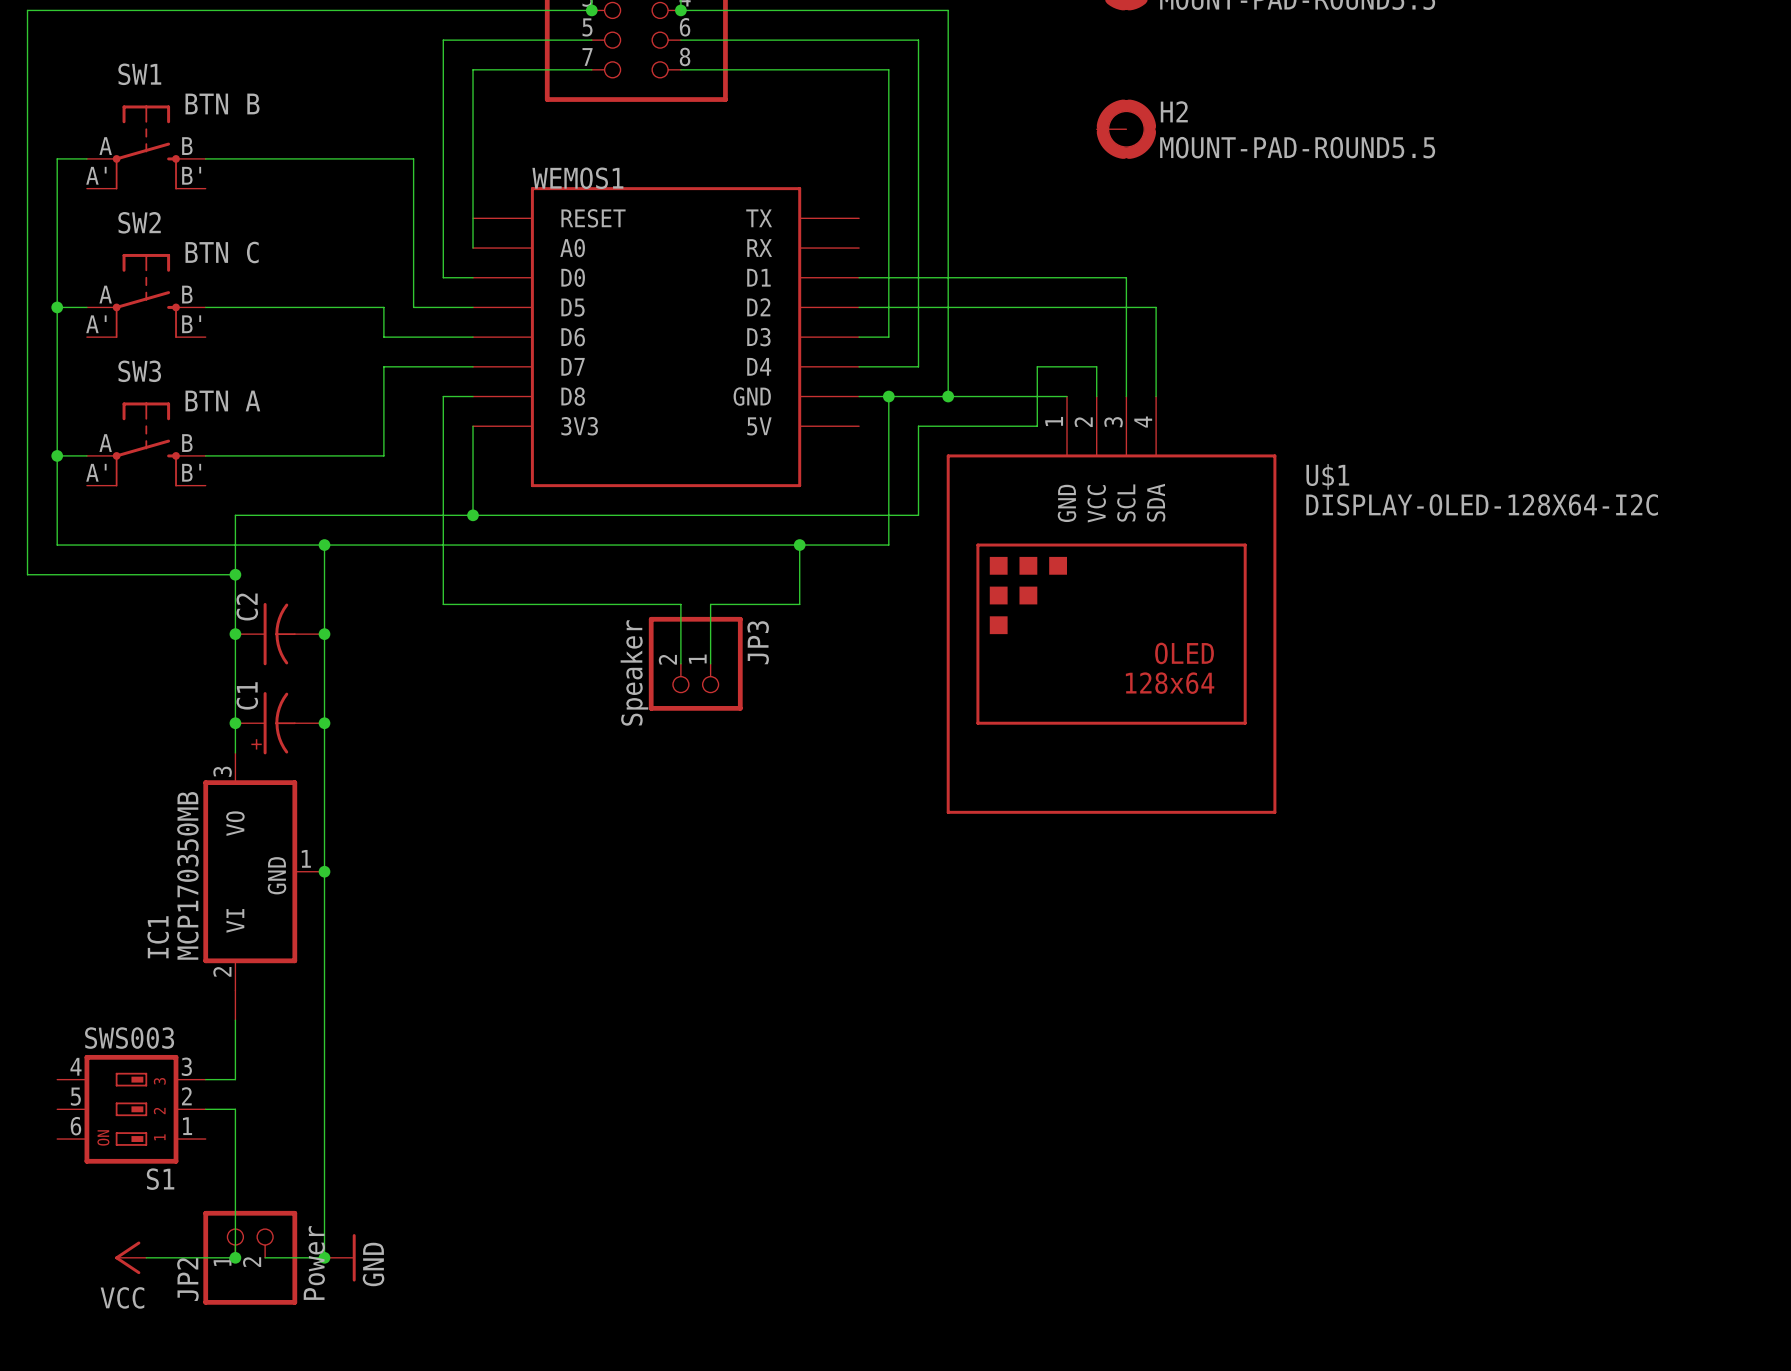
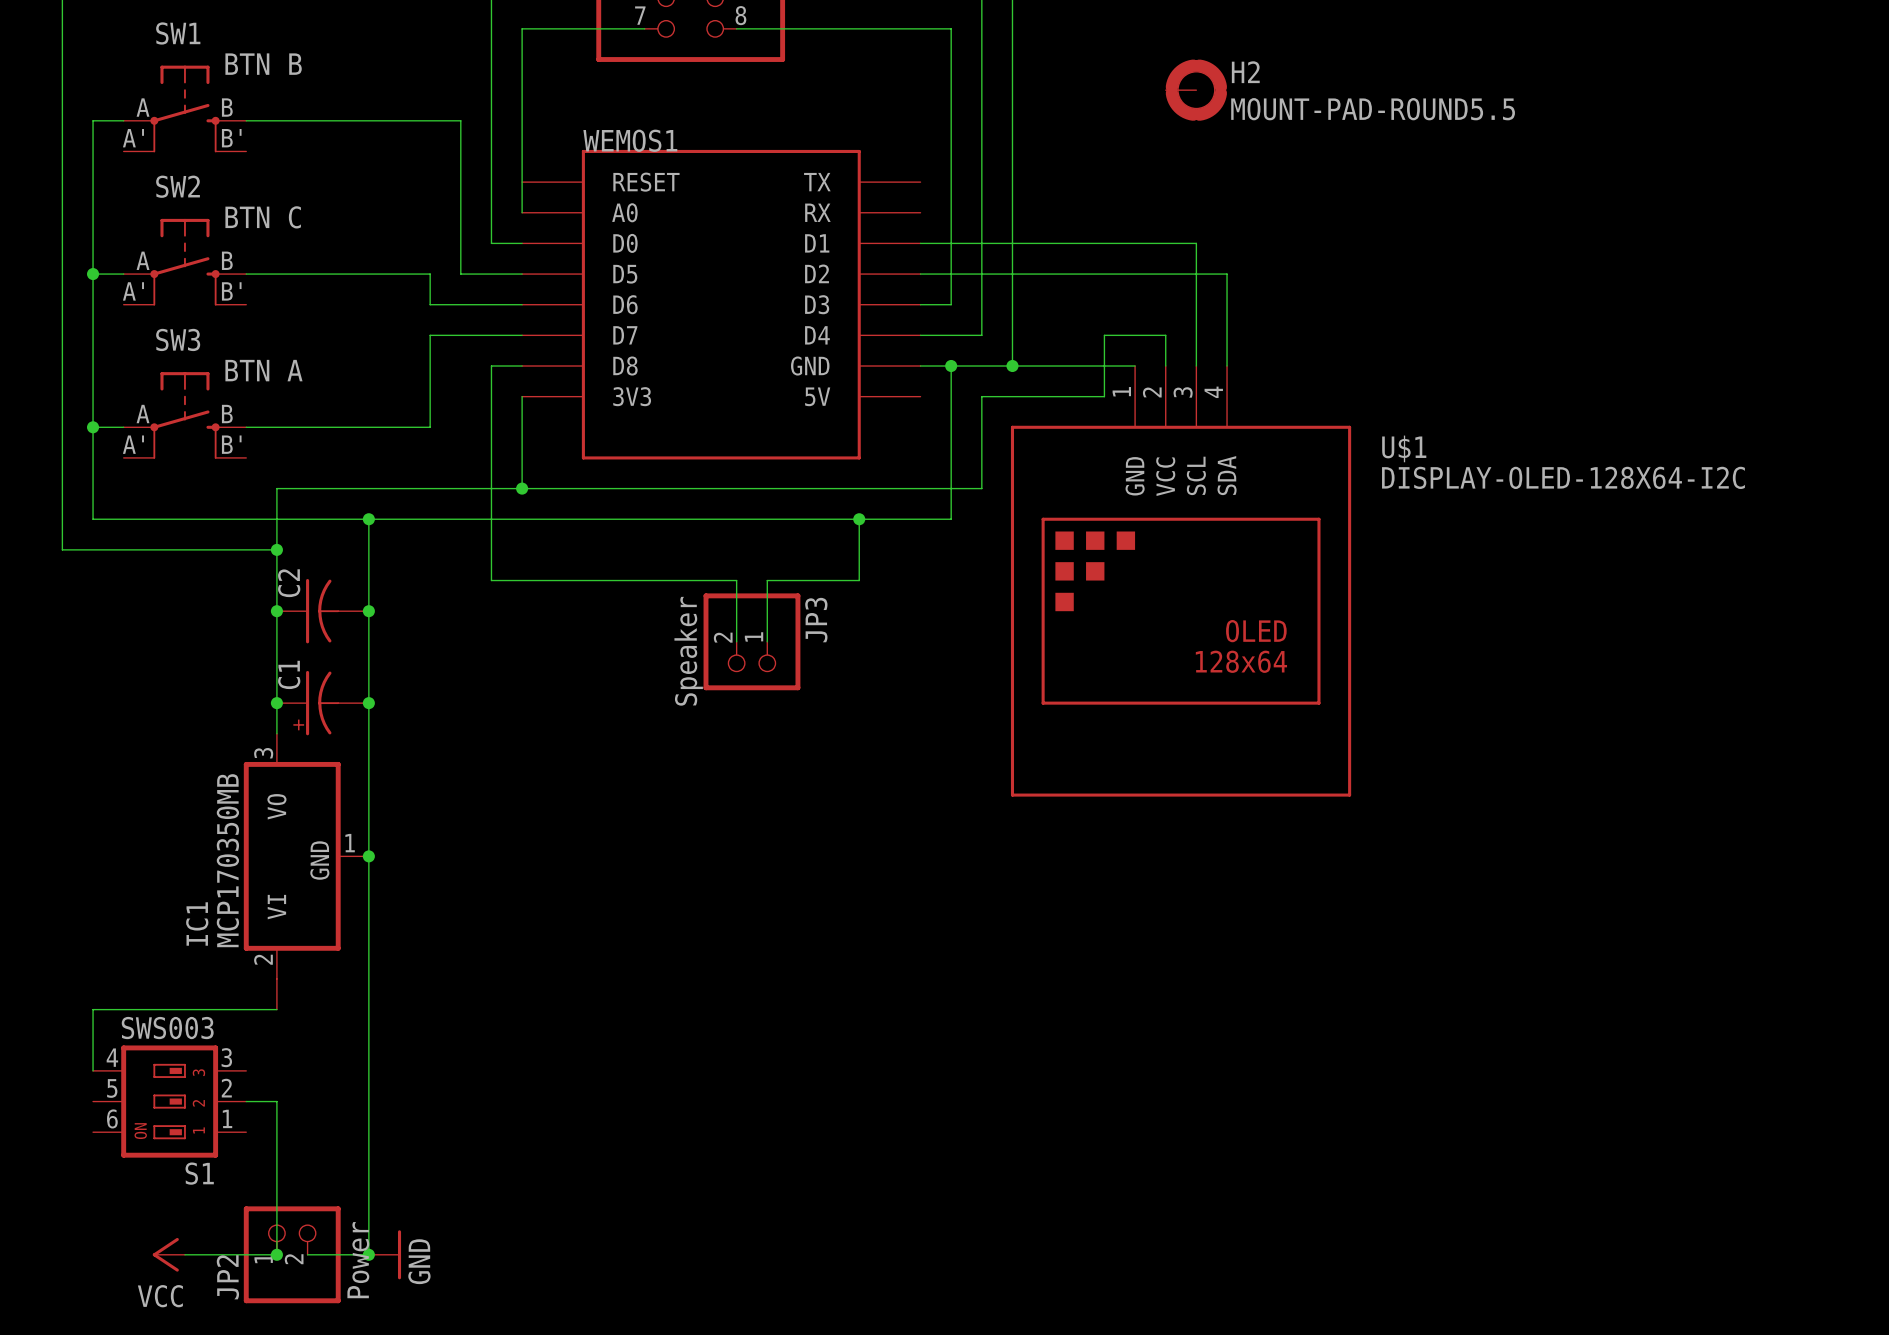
wire: (235, 1020) (235, 1079) (205, 1079) -> (276, 1009) (93, 1009) (93, 1070)

